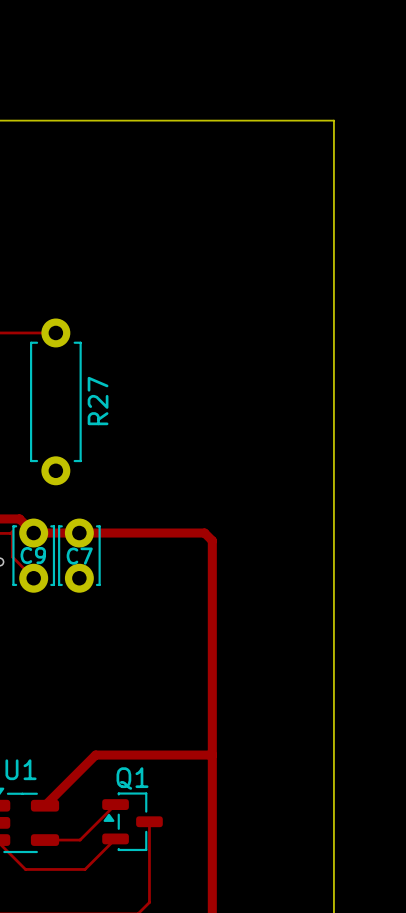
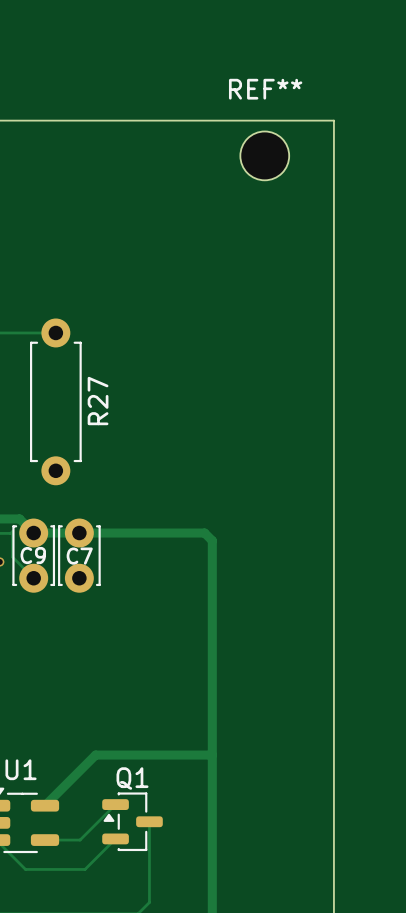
REF**: none -> (264, 155)

